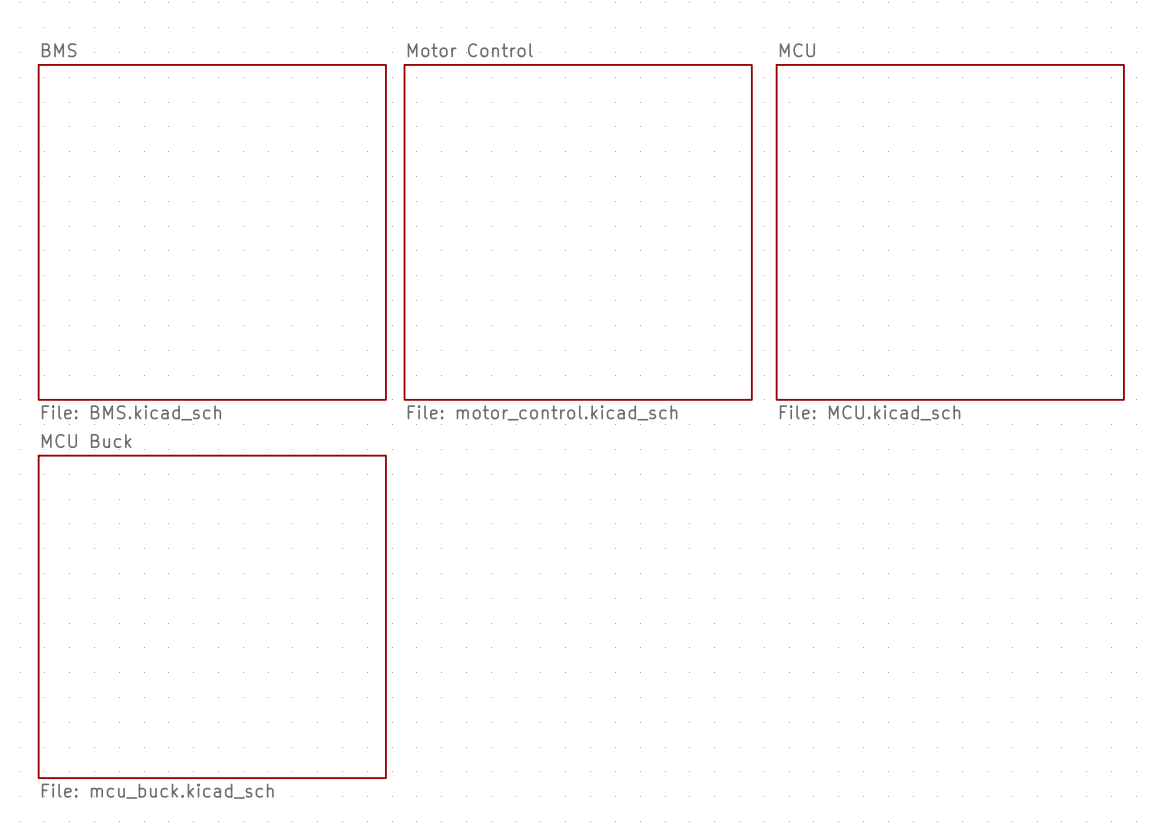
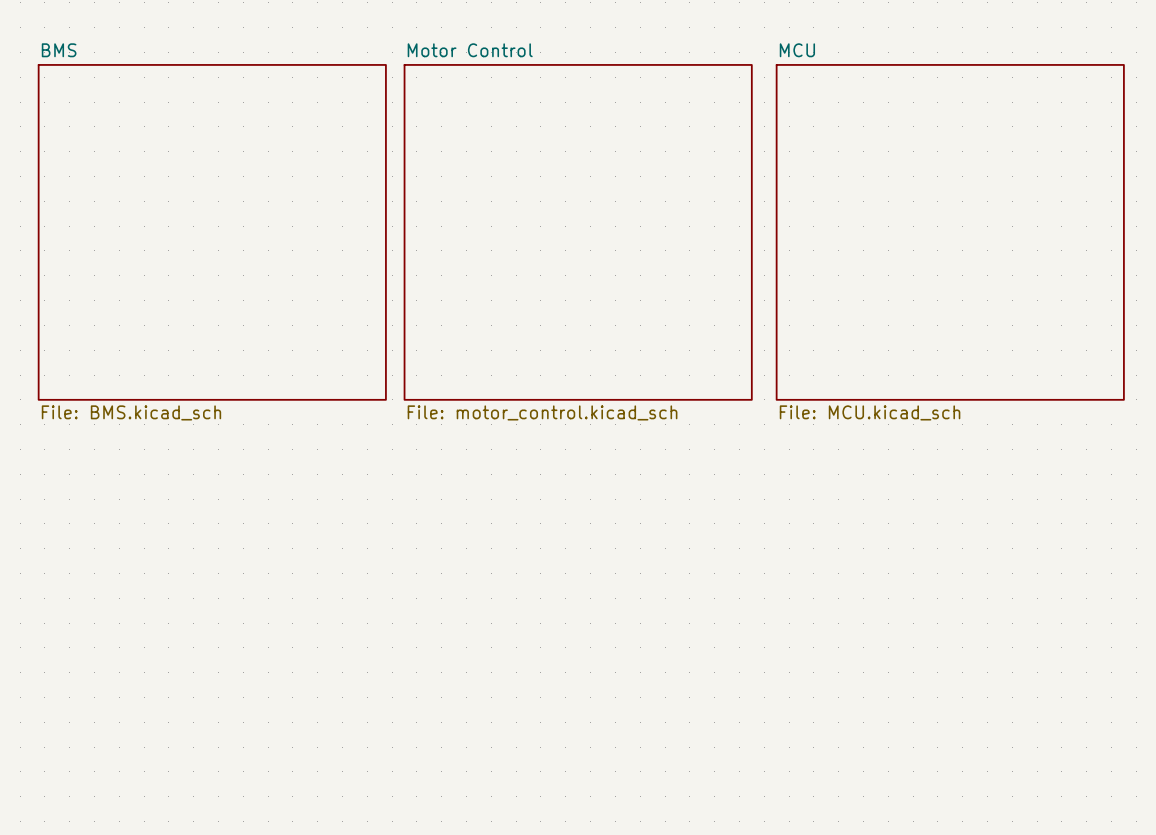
sheet MCU Buck: File: mcu_buck.kicad_sch (212, 616) -> none

